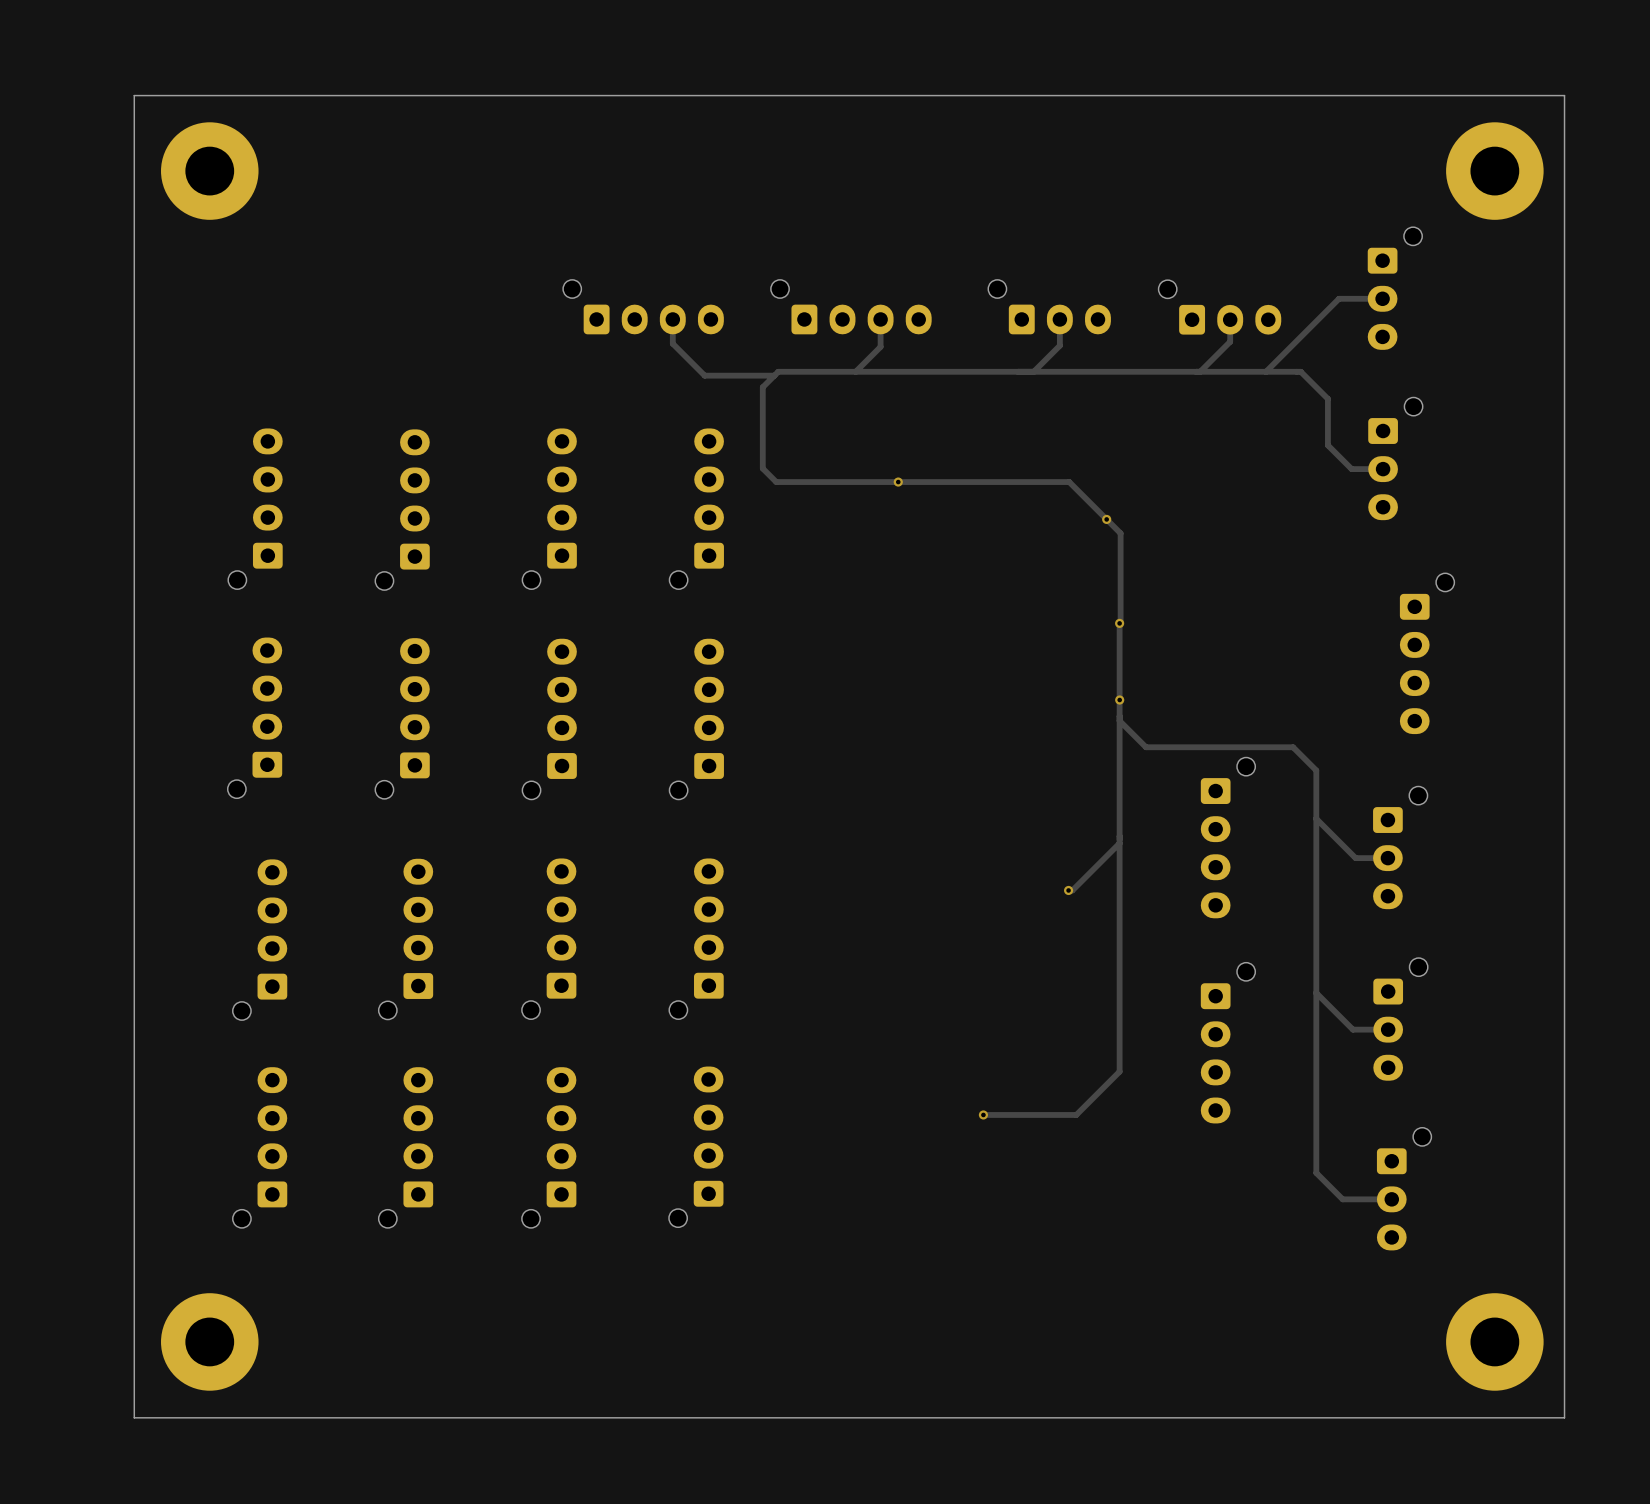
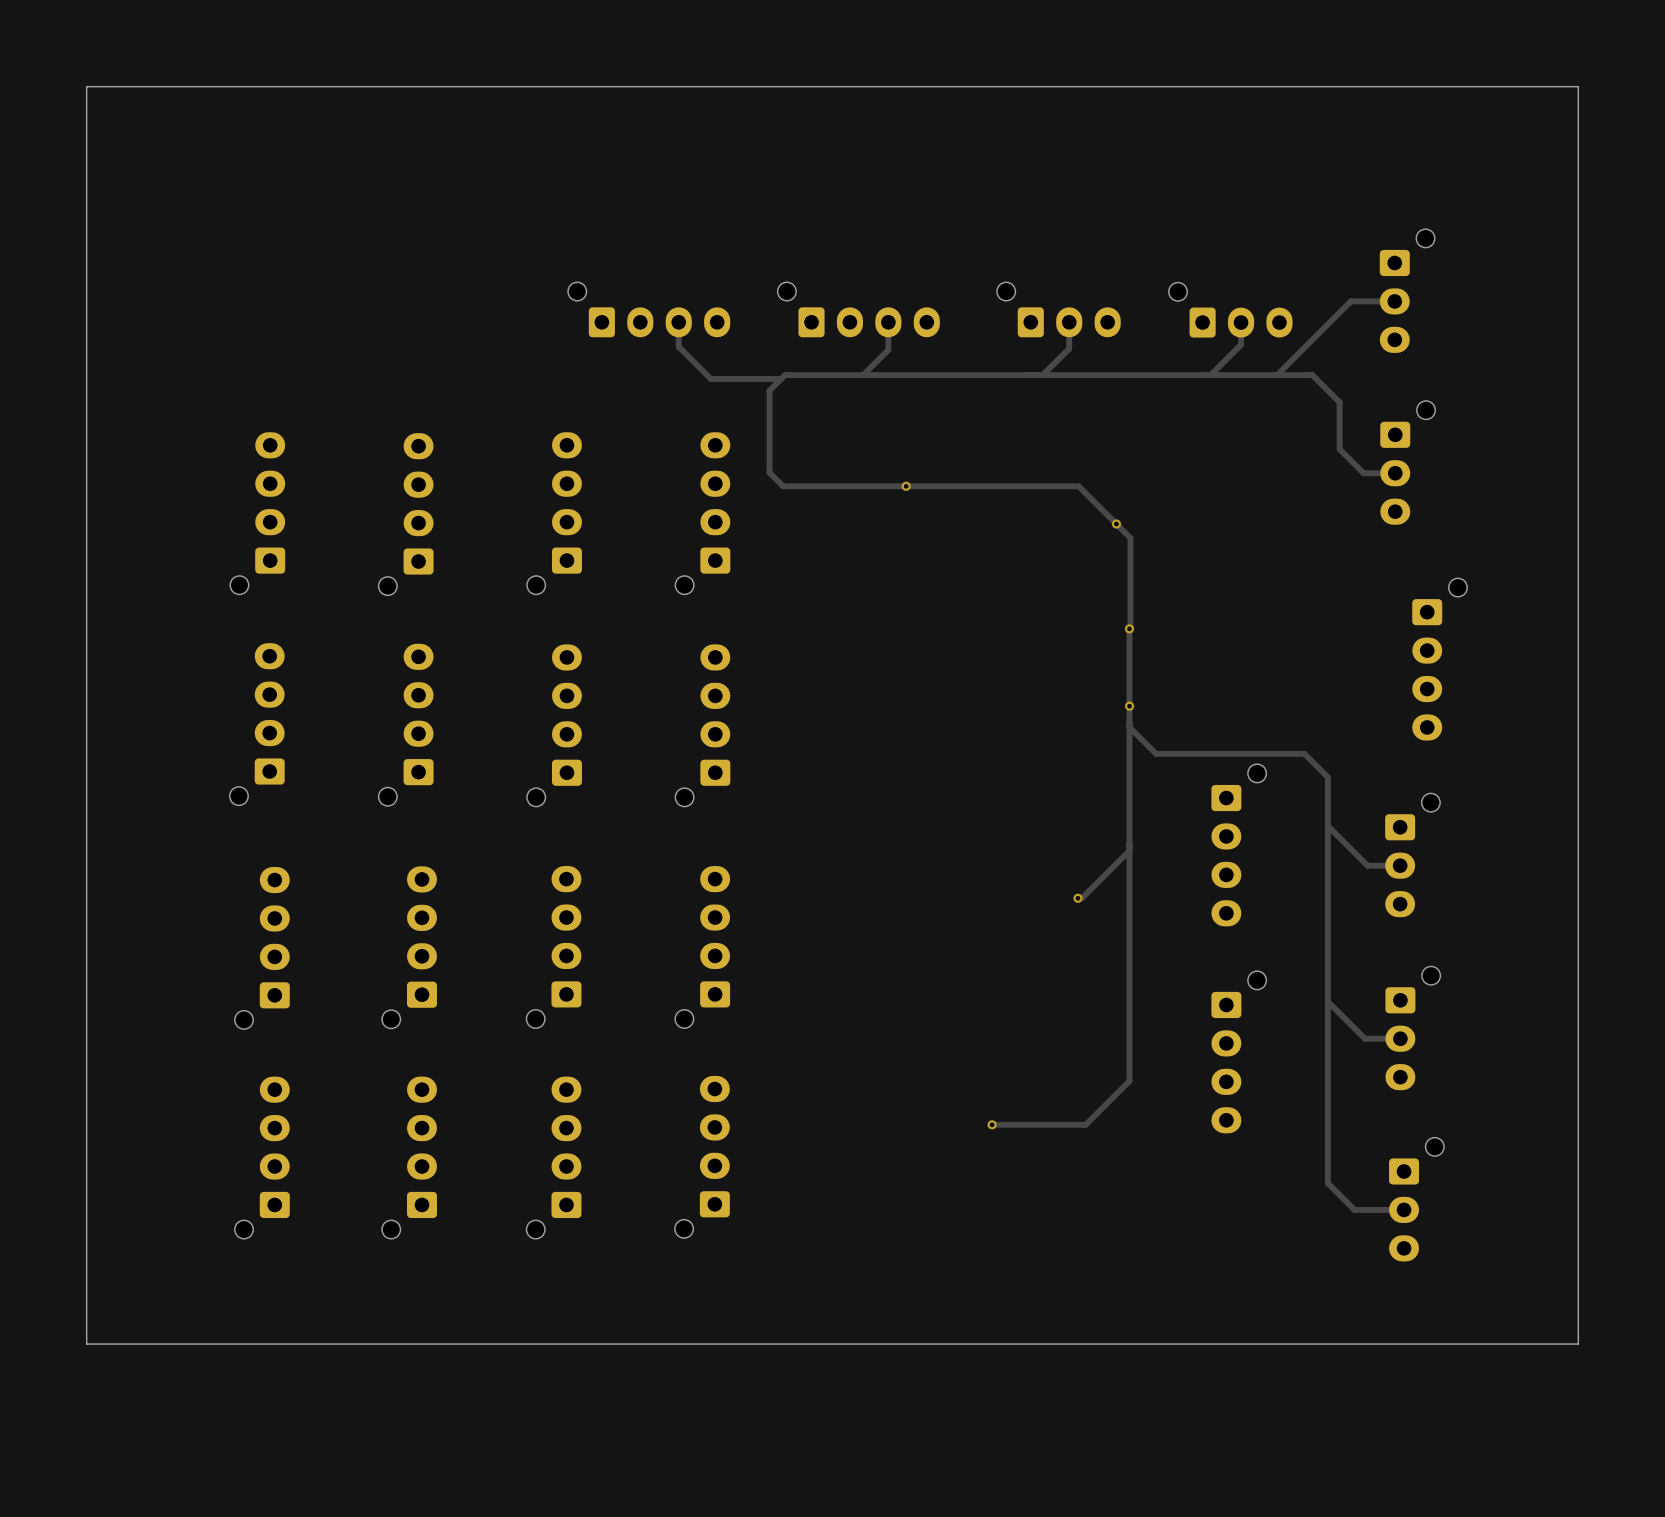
board edge: (1564, 95) (134, 95) (134, 1417) (1564, 1417) (1564, 1332) -> (1578, 96) (1578, 86) (86, 86) (86, 1344) (1578, 1344)
part: (209, 171) -> none
part: (1494, 171) -> none
part: (209, 1341) -> none
part: (1494, 1341) -> none

